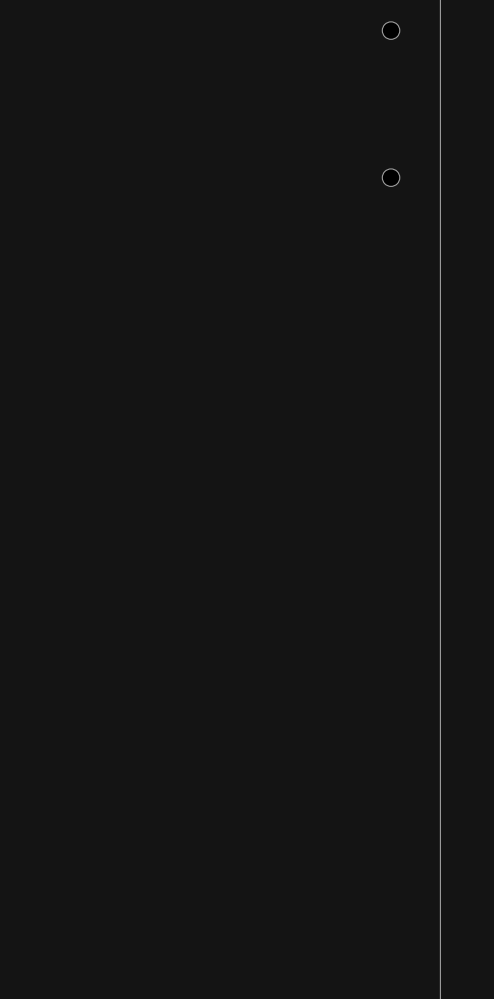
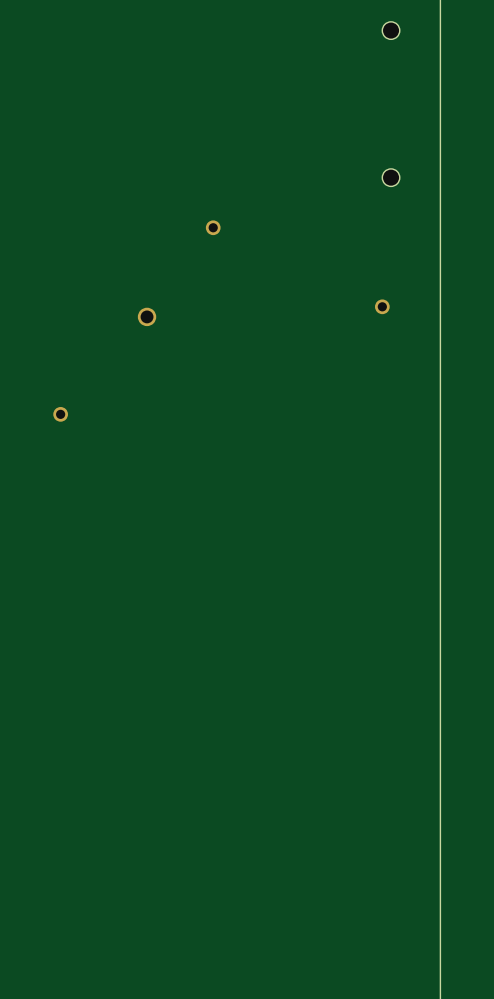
via: none -> (213, 227)
via: none -> (382, 306)
via: none -> (147, 316)
via: none -> (60, 414)

